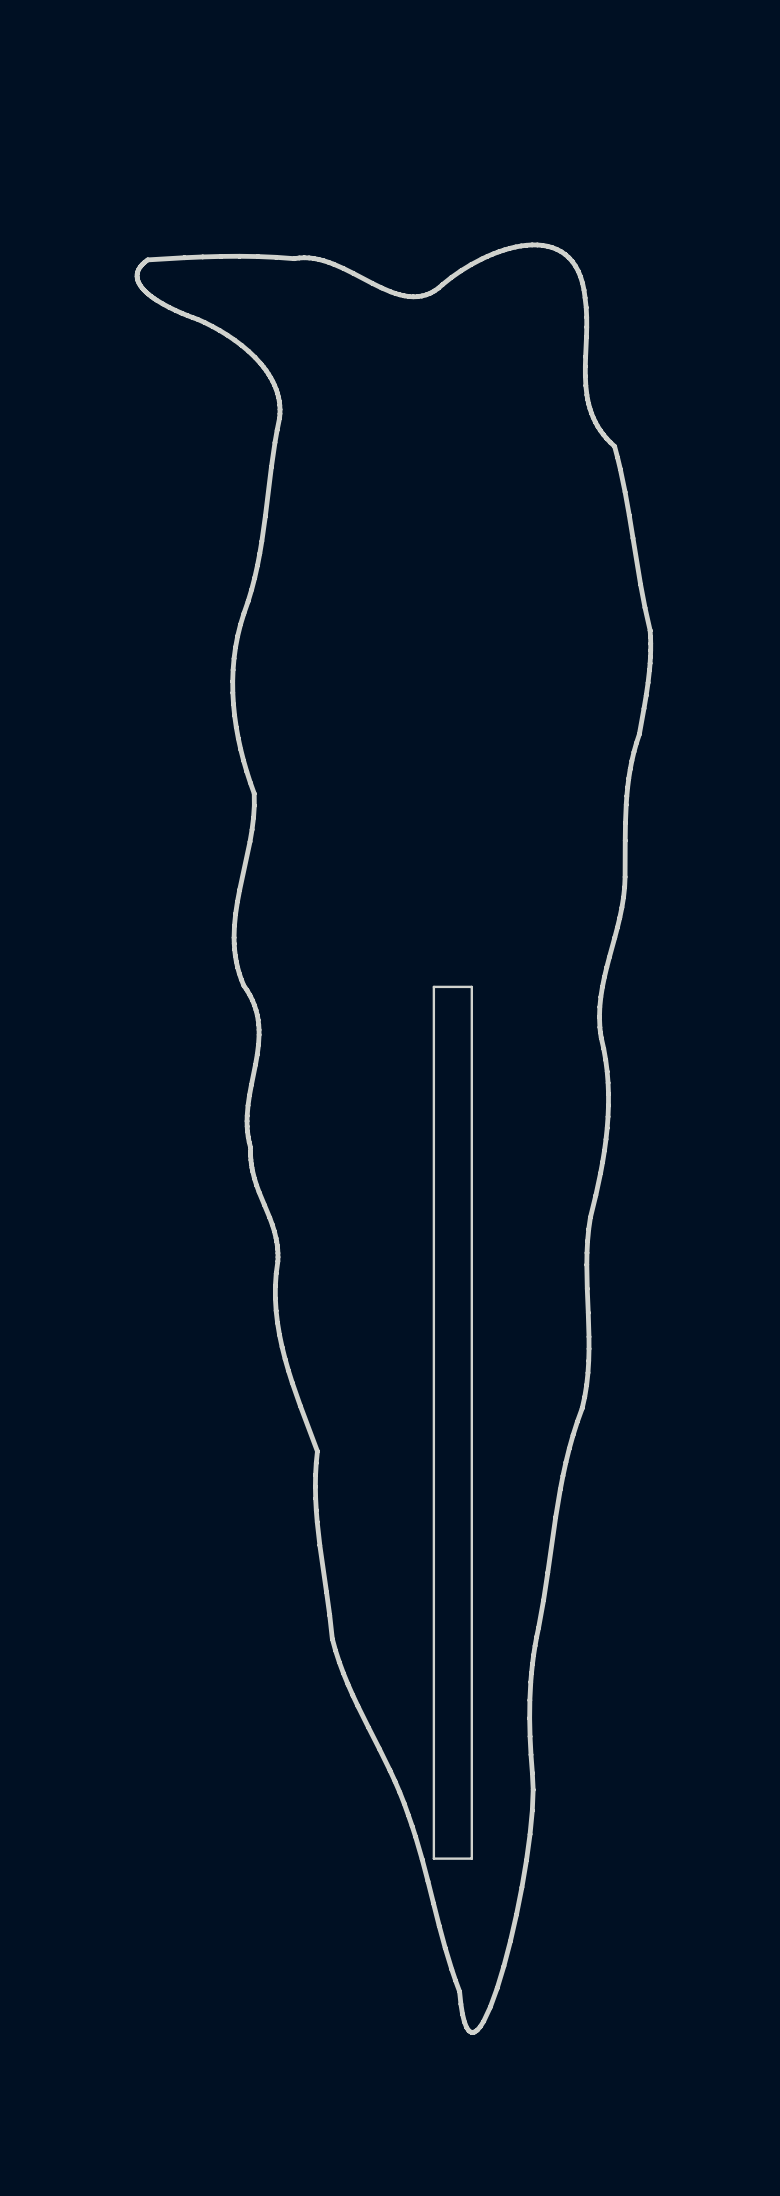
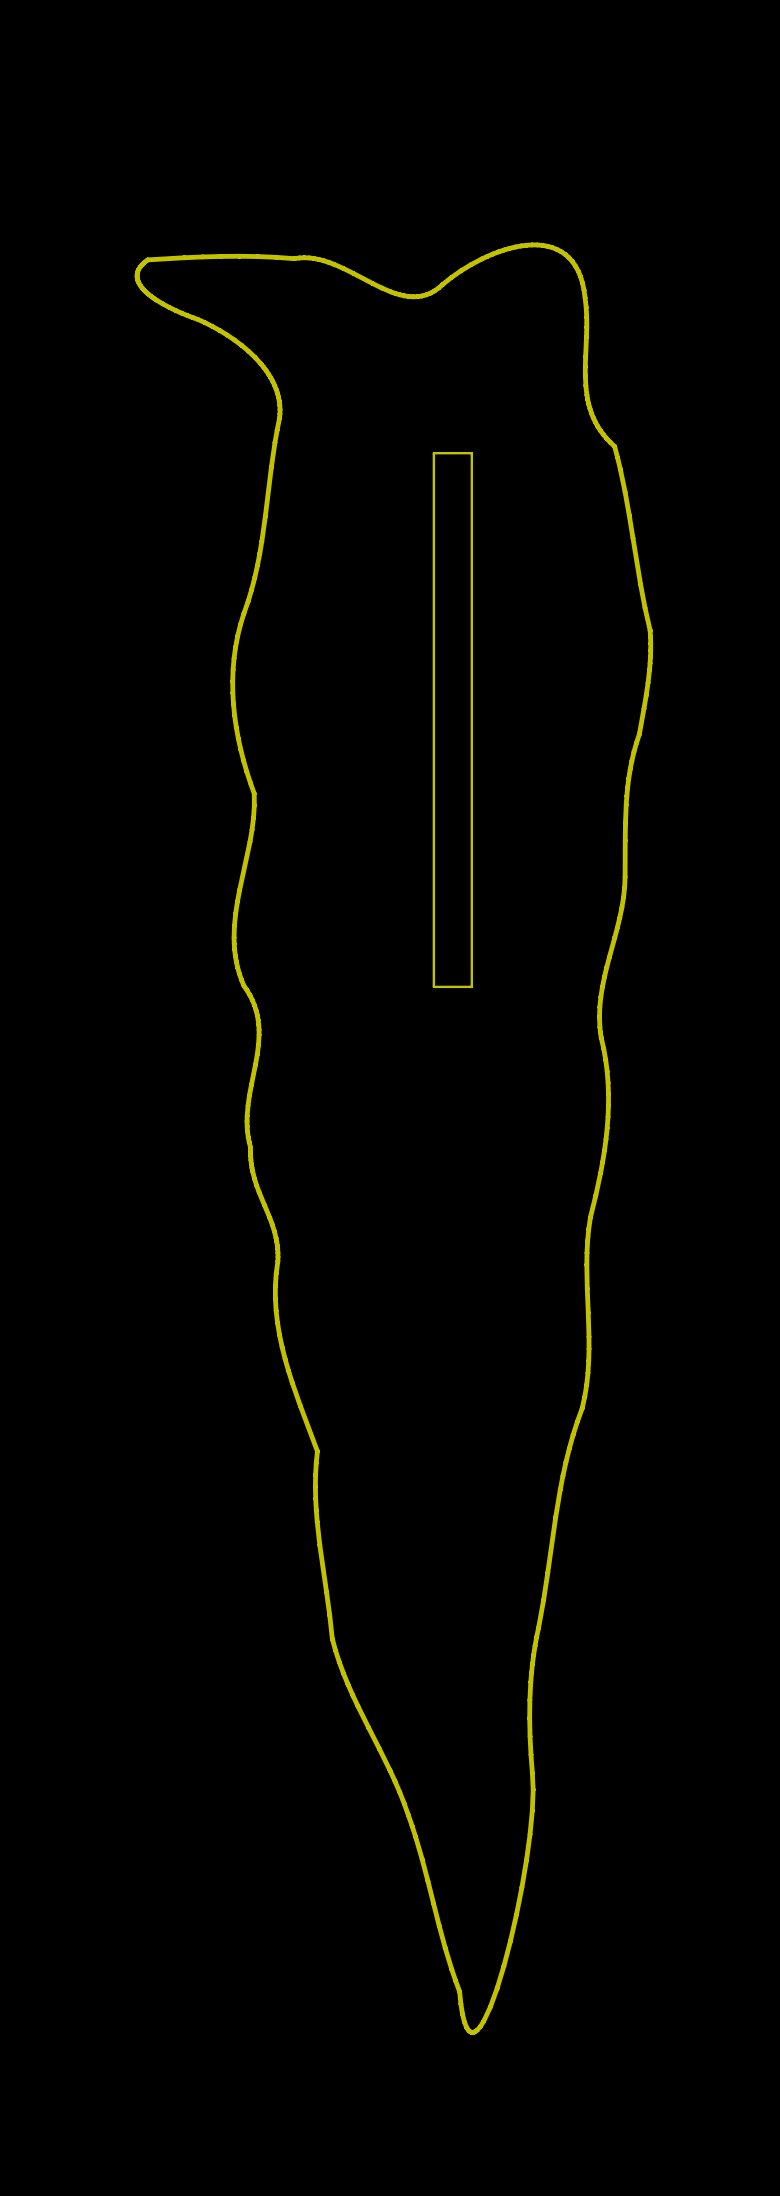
board edge: (471, 986) (471, 1858) (433, 1858) (433, 986) -> (471, 986) (471, 453) (433, 453) (433, 986)

